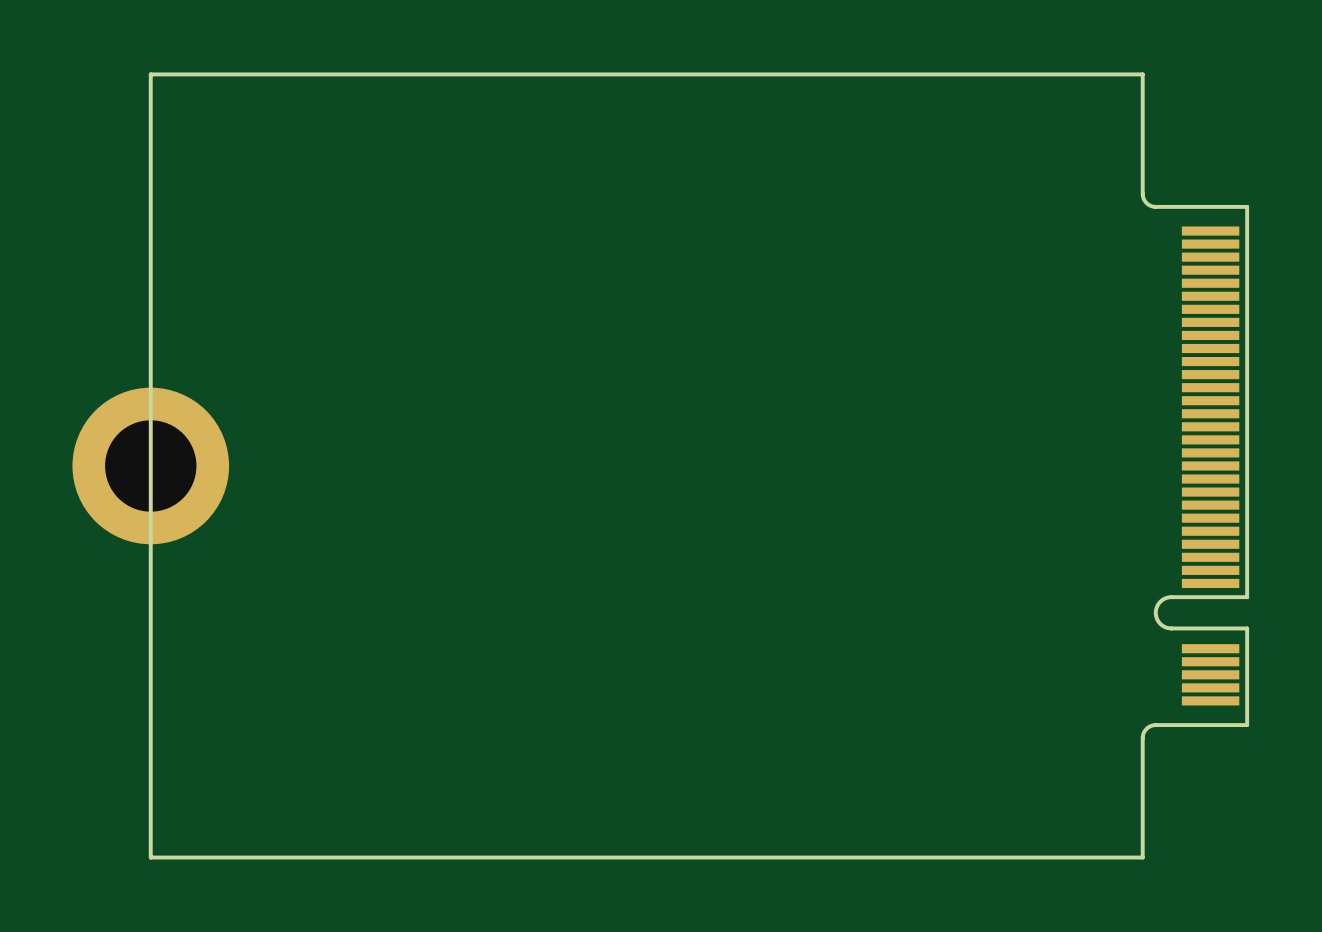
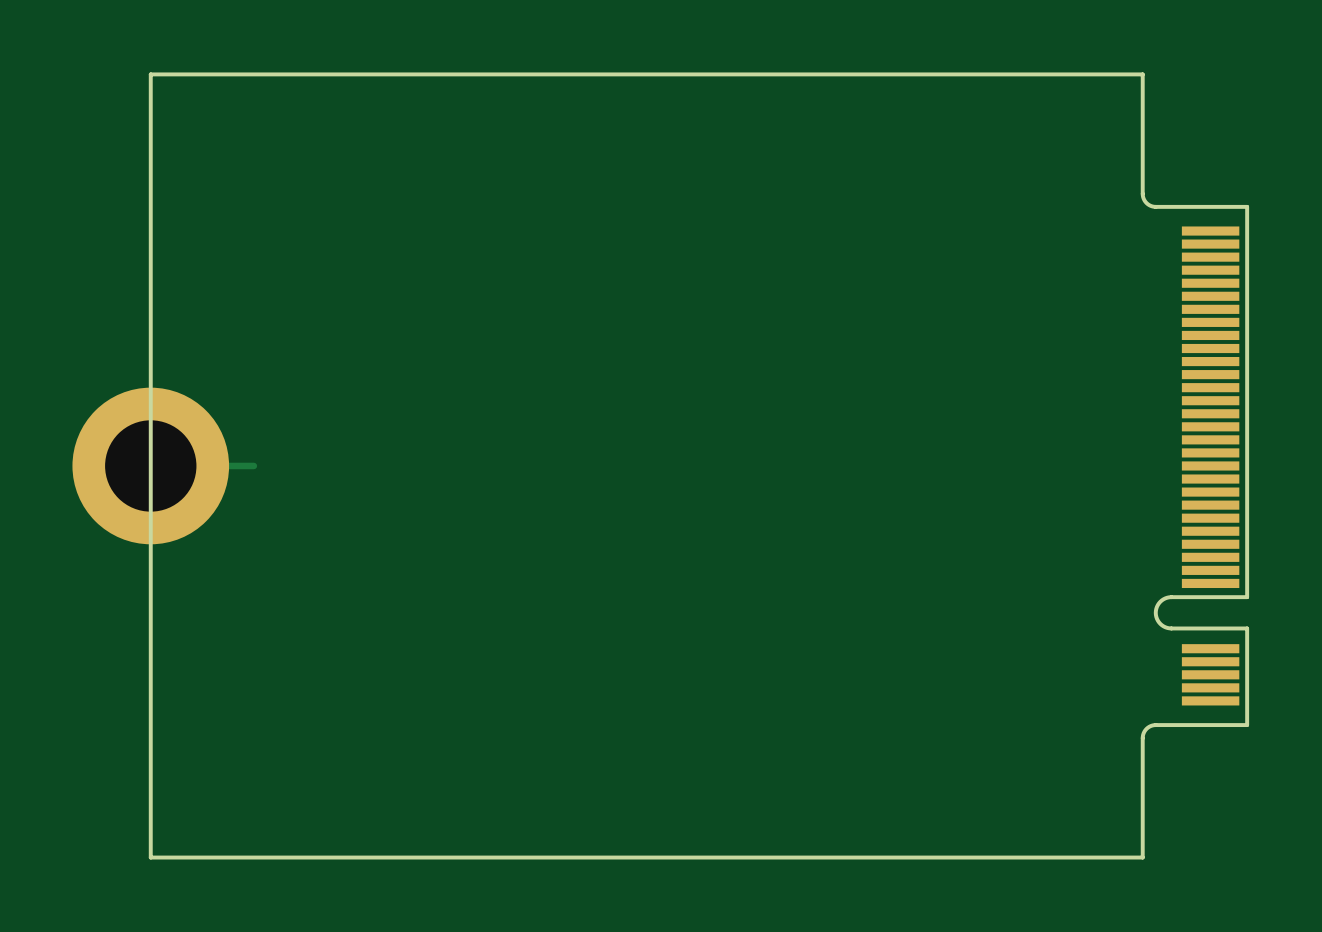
track: none -> (253, 465) (225, 465)

